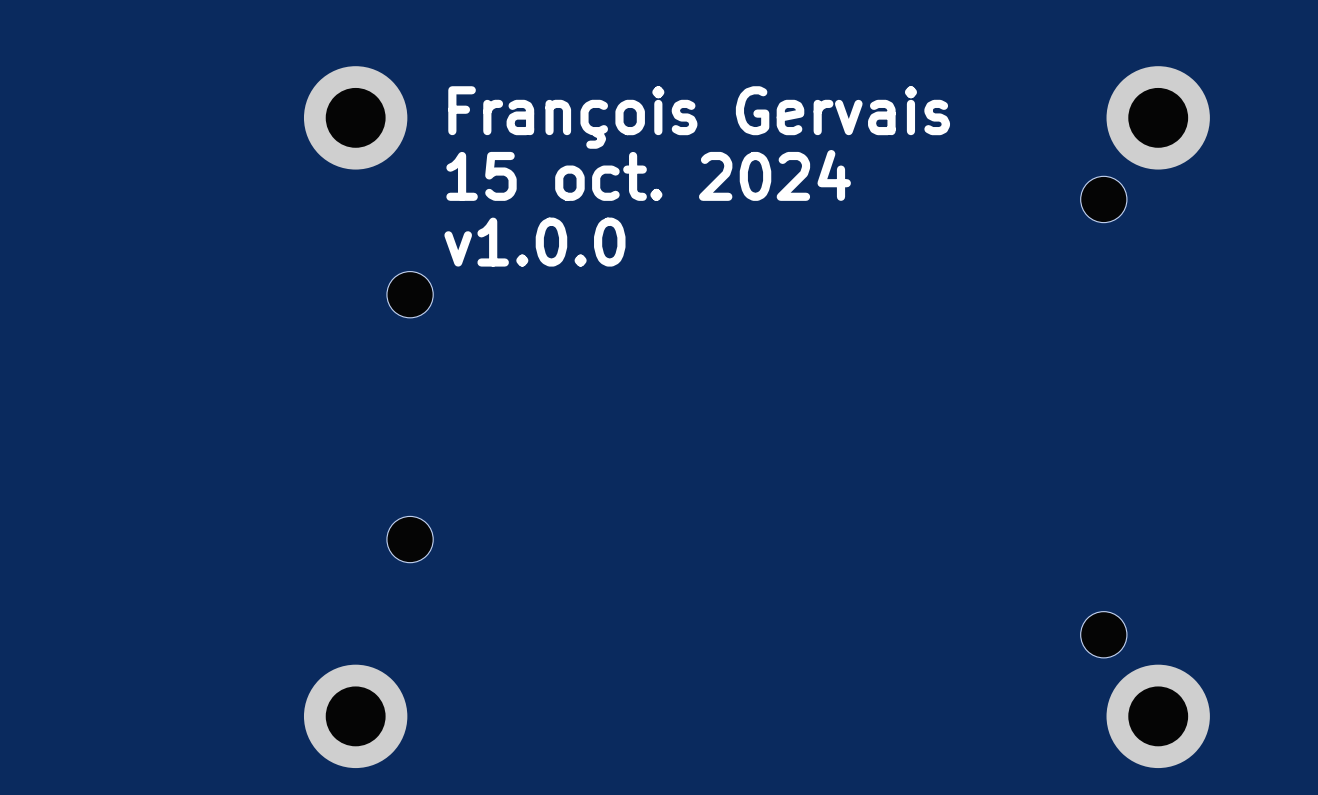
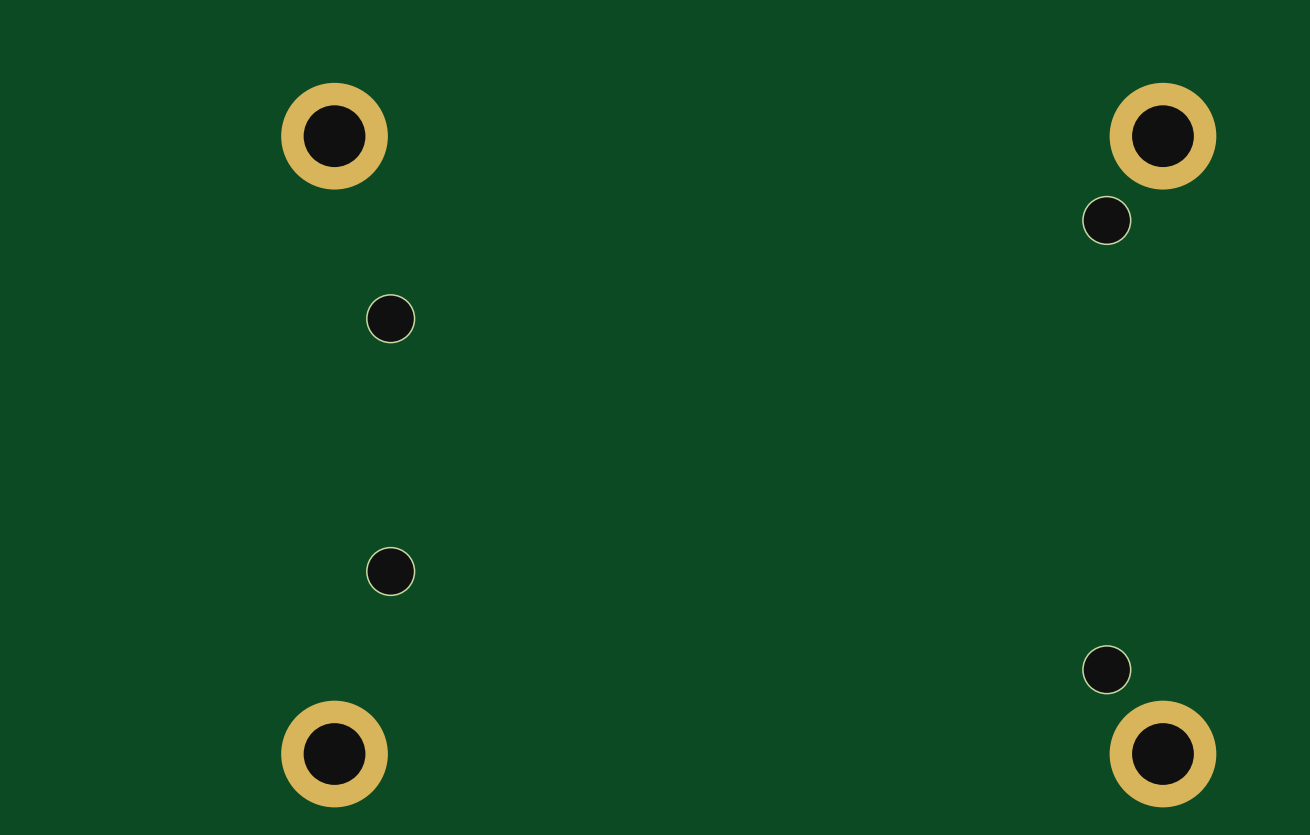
text: François Gervais (699, 117) -> none
text: 15 oct. 2024 (648, 175) -> none
text: v1.0.0 (534, 242) -> none

